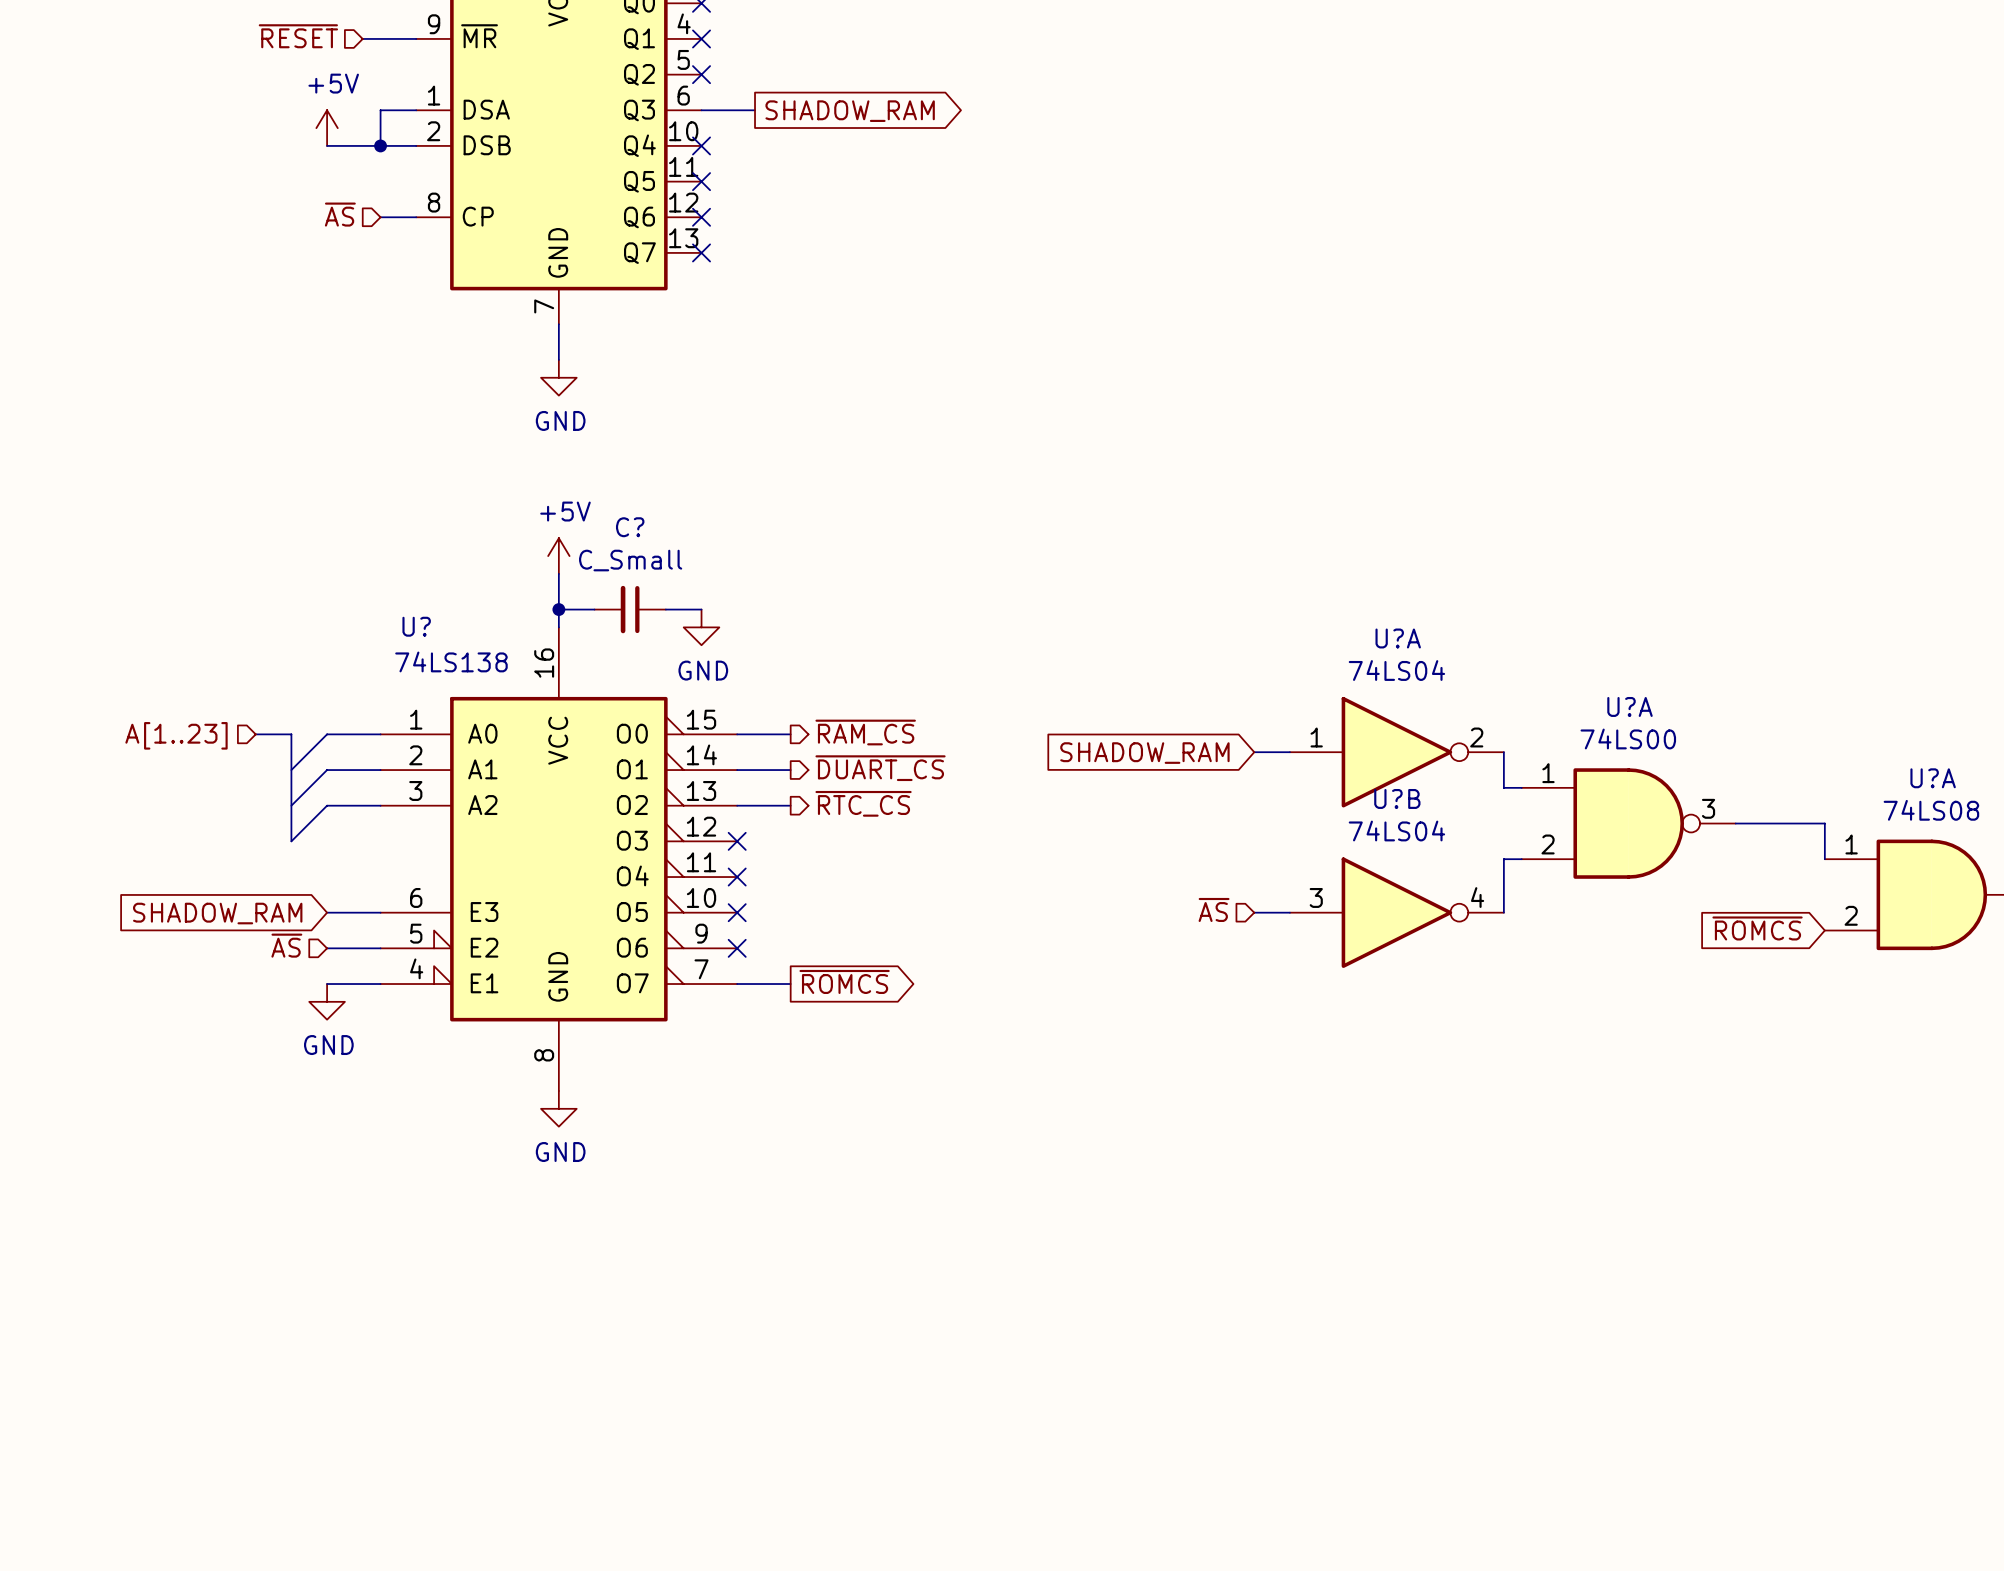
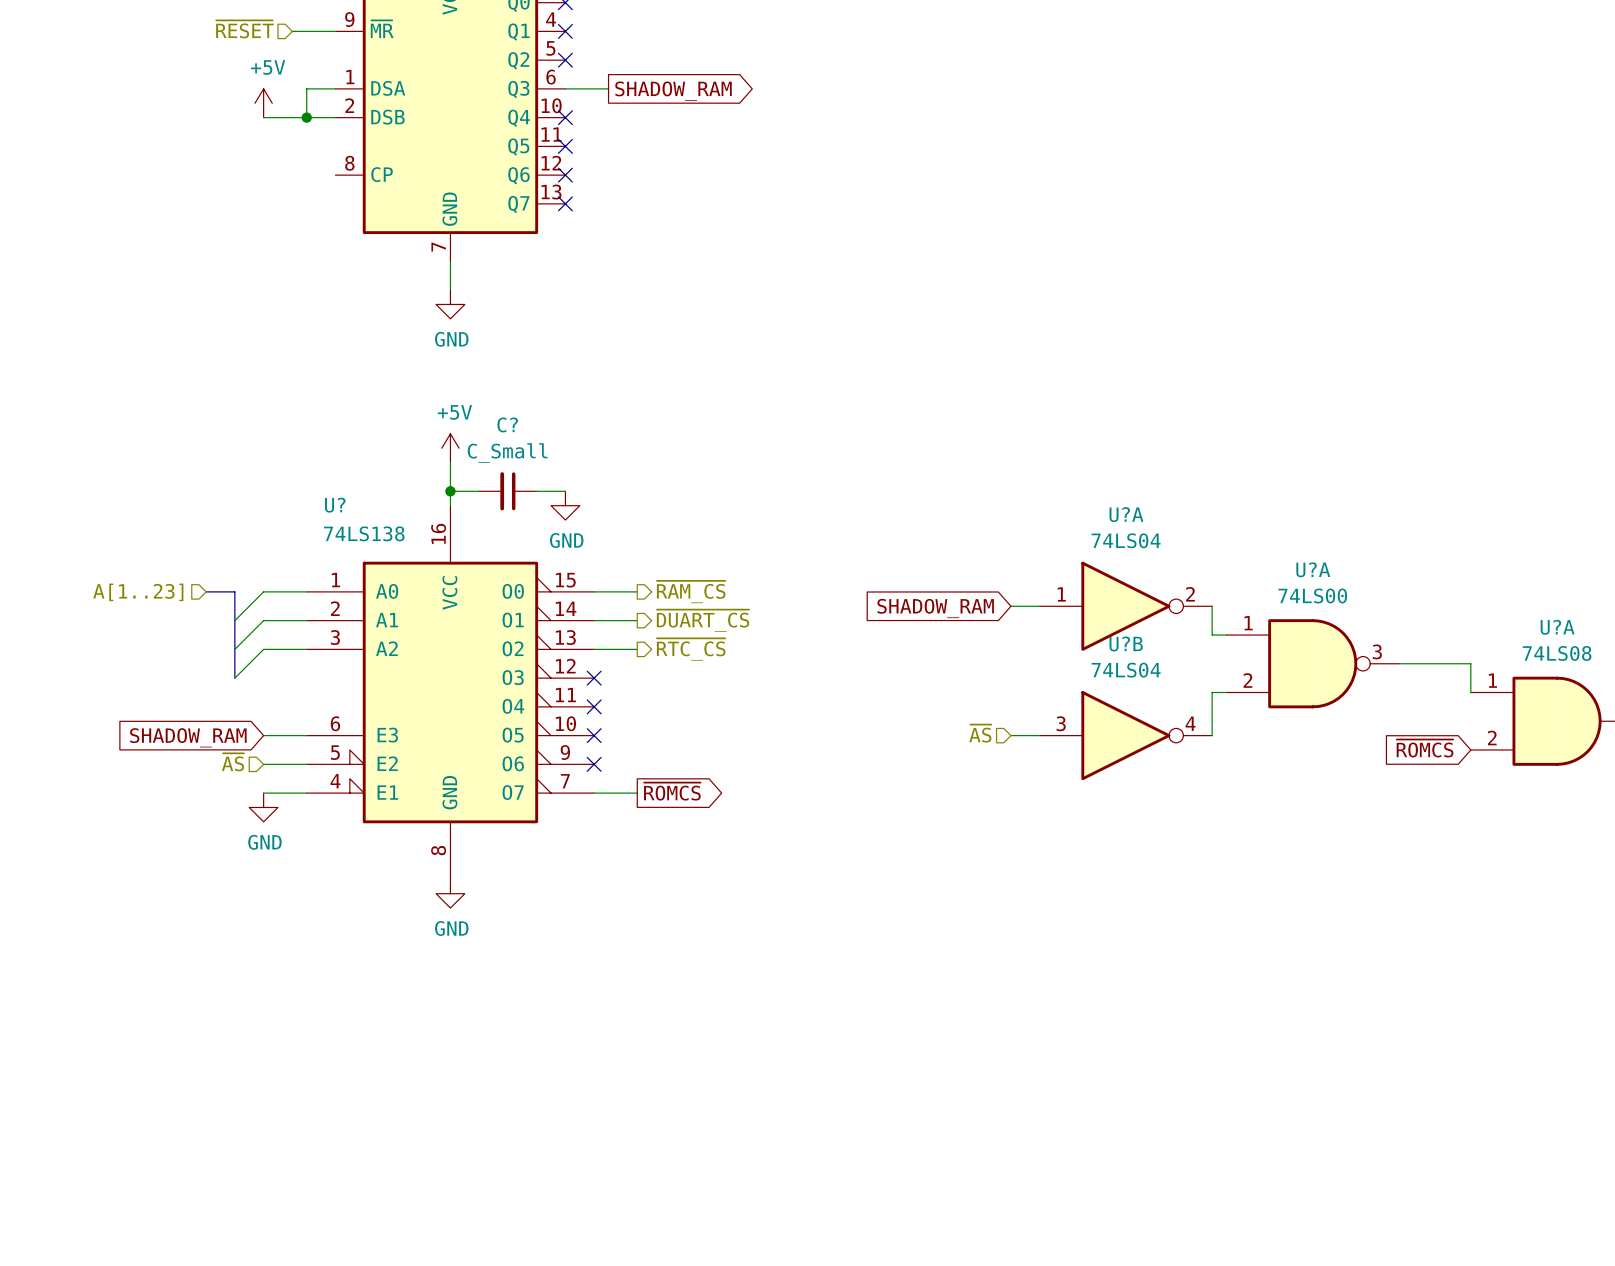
hierarchical label: ~{AS} (340, 214) -> none
wire: (380, 217) (416, 217) -> none

